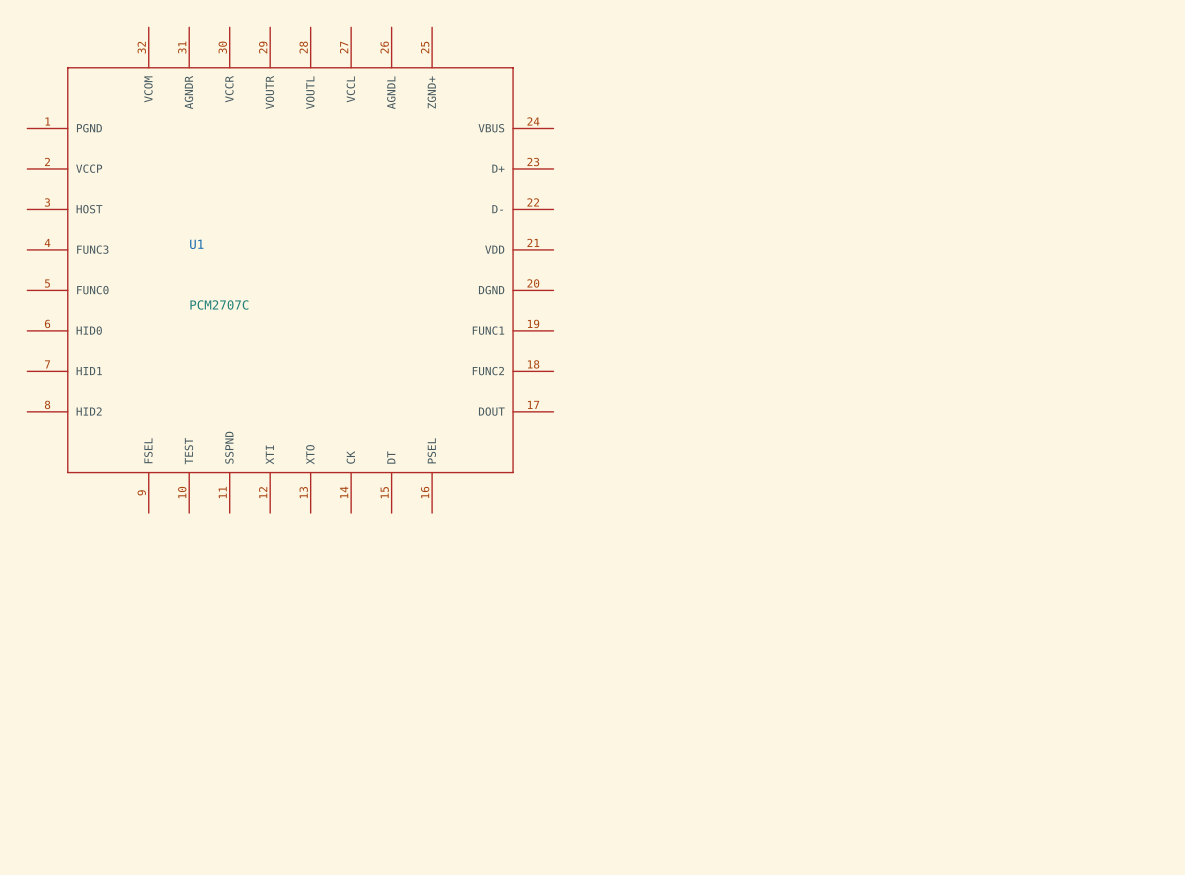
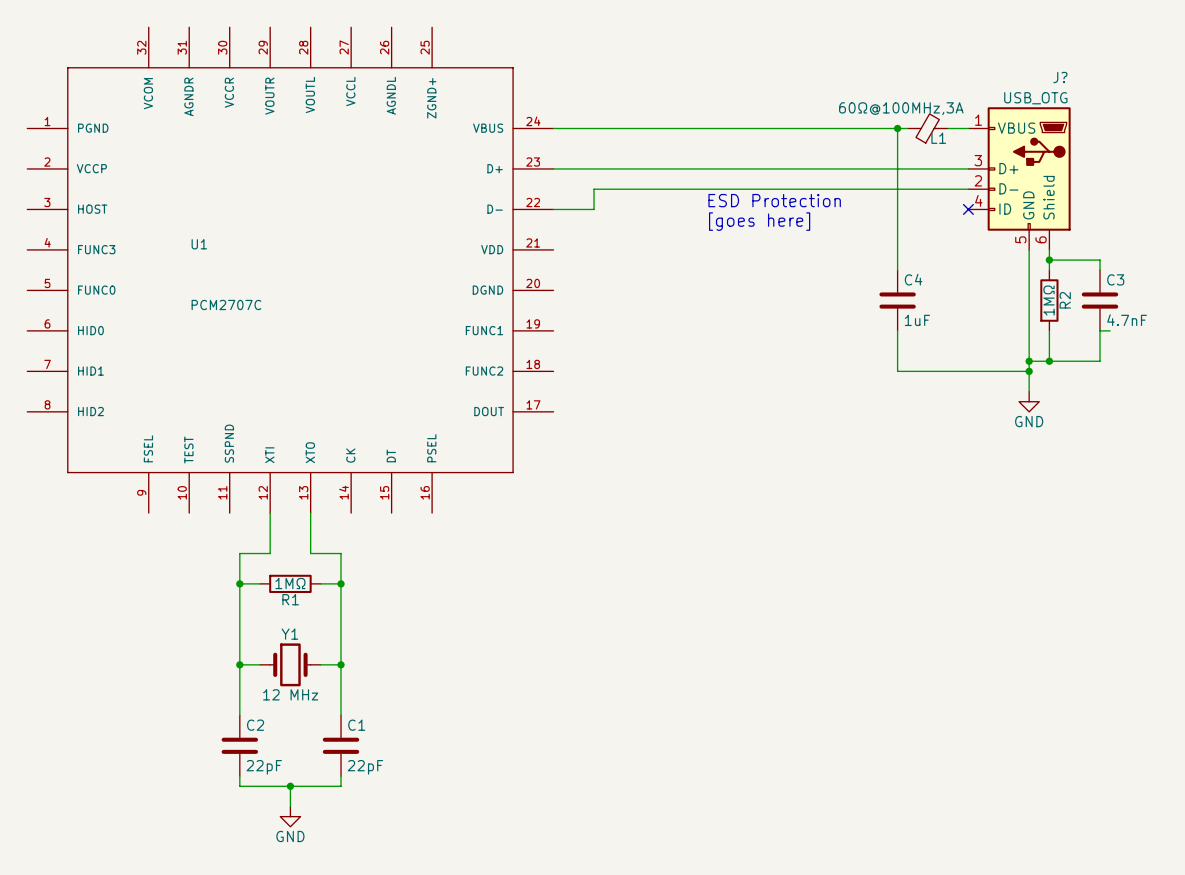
wire: none -> (553, 128) (907, 128)
wire: none -> (897, 128) (897, 270)
junction: none -> (897, 128)
L1: none -> 60Ω@100MHz,3A (927, 128)
wire: none -> (948, 128) (968, 128)
wire: none -> (553, 168) (968, 168)
J?: none -> USB_OTG (1019, 178)
wire: none -> (968, 189) (594, 189) (594, 209) (553, 209)
text: none -> ESD Protection (774, 200)
no-connect mark: none -> (968, 209)
text: none -> [goes here] (759, 221)
wire: none -> (1029, 249) (1029, 391)
wire: none -> (1049, 249) (1049, 270)
wire: none -> (1049, 260) (1099, 260) (1099, 270)
junction: none -> (1049, 260)
C4: none -> 1uF (897, 300)
R2: none -> 1MΩ (1049, 300)
C3: none -> 4.7nF (1099, 300)
wire: none -> (897, 330) (897, 371) (1029, 371)
wire: none -> (1049, 330) (1049, 361)
wire: none -> (1110, 330) (1099, 330) (1099, 361) (1029, 361)
junction: none -> (1029, 361)
junction: none -> (1049, 361)
junction: none -> (1029, 371)
power symbol: none -> GND (1029, 401)
wire: none -> (270, 513) (270, 553) (239, 553) (239, 715)
wire: none -> (310, 513) (310, 553) (341, 553) (341, 715)
wire: none -> (239, 583) (260, 583)
junction: none -> (239, 583)
R1: none -> 1MΩ (290, 583)
wire: none -> (320, 583) (341, 583)
junction: none -> (341, 583)
wire: none -> (239, 664) (260, 664)
junction: none -> (239, 664)
Y1: none -> 12 MHz (290, 664)
wire: none -> (320, 664) (341, 664)
junction: none -> (341, 664)
C2: none -> 22pF (239, 745)
C1: none -> 22pF (341, 745)
wire: none -> (239, 776) (239, 786) (341, 786) (341, 776)
wire: none -> (290, 786) (290, 806)
junction: none -> (290, 786)
power symbol: none -> GND (290, 816)

